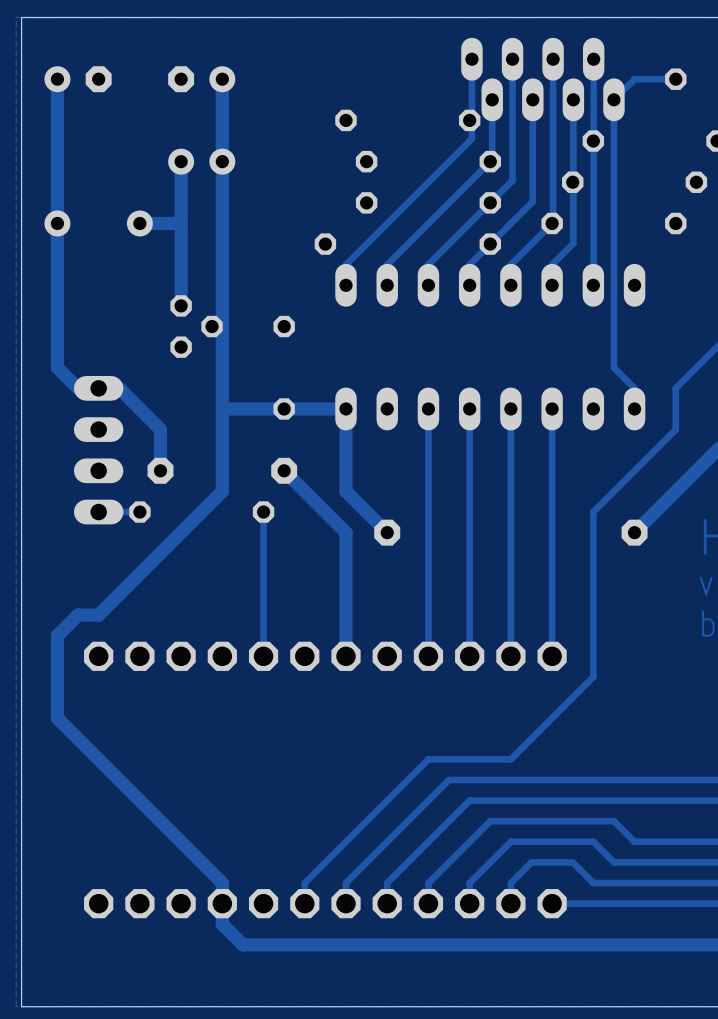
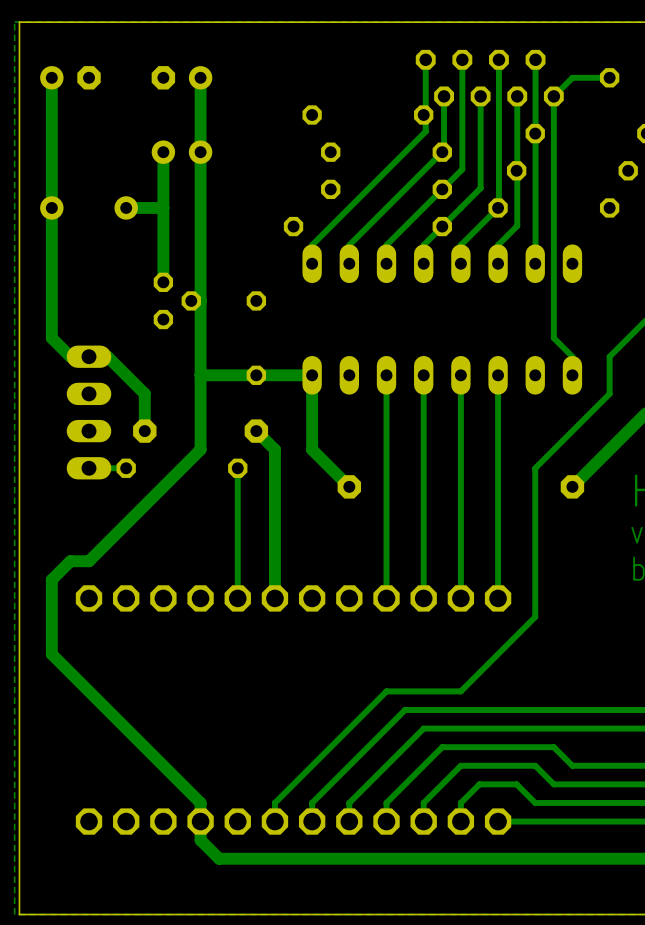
part footprint: [461, 37, 625, 122] -> [415, 49, 564, 107]
track: (304, 491) (346, 532) (346, 656) -> (274, 449) (274, 598)

